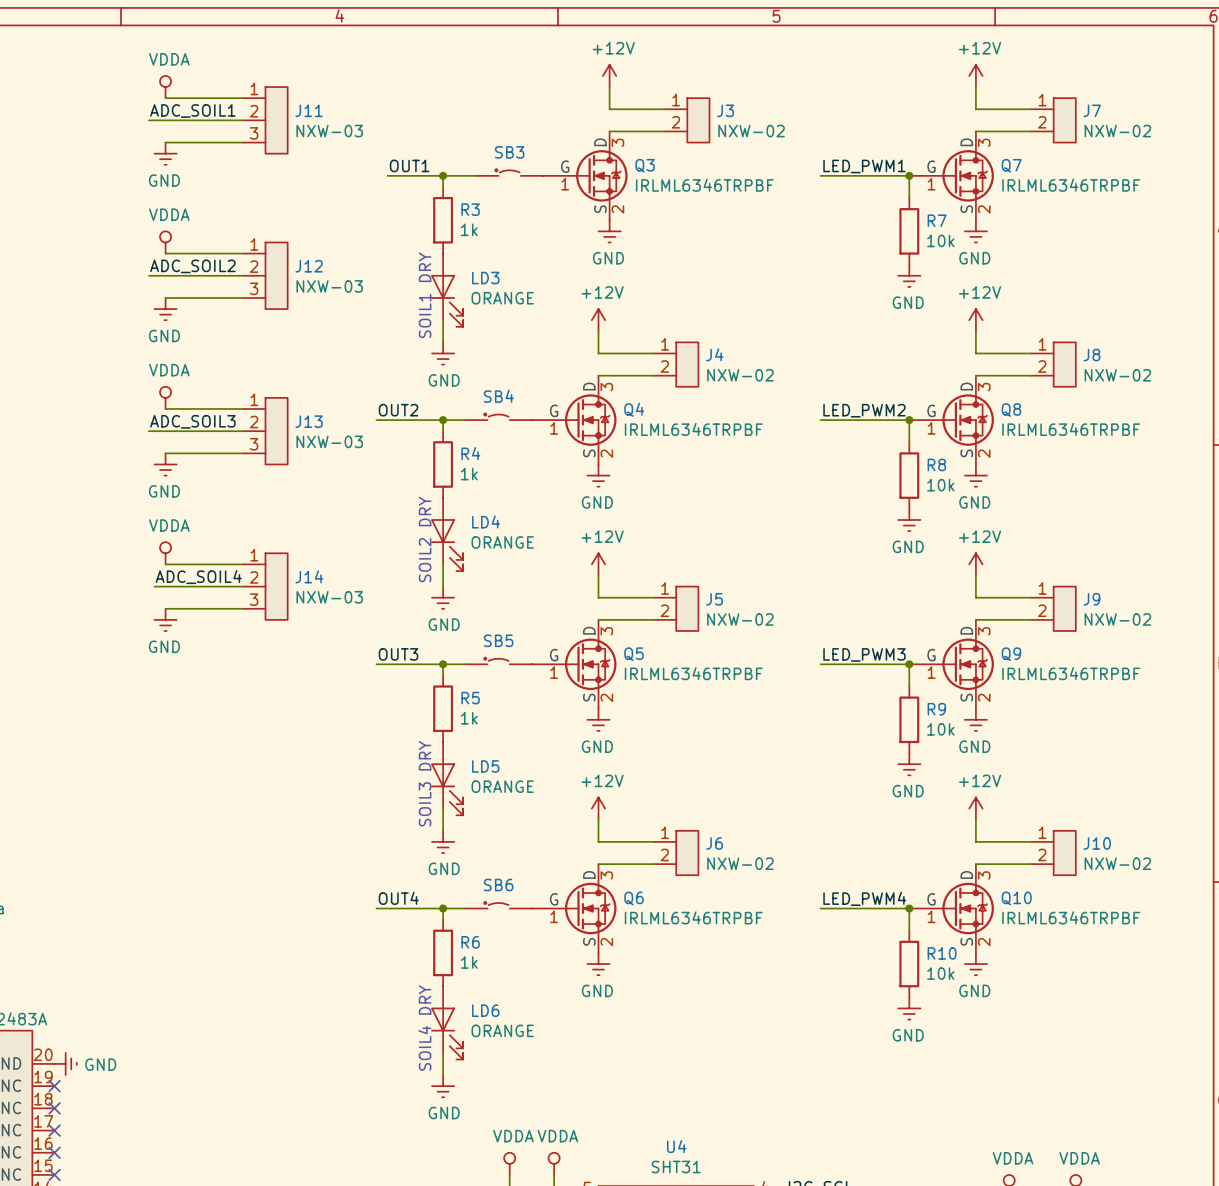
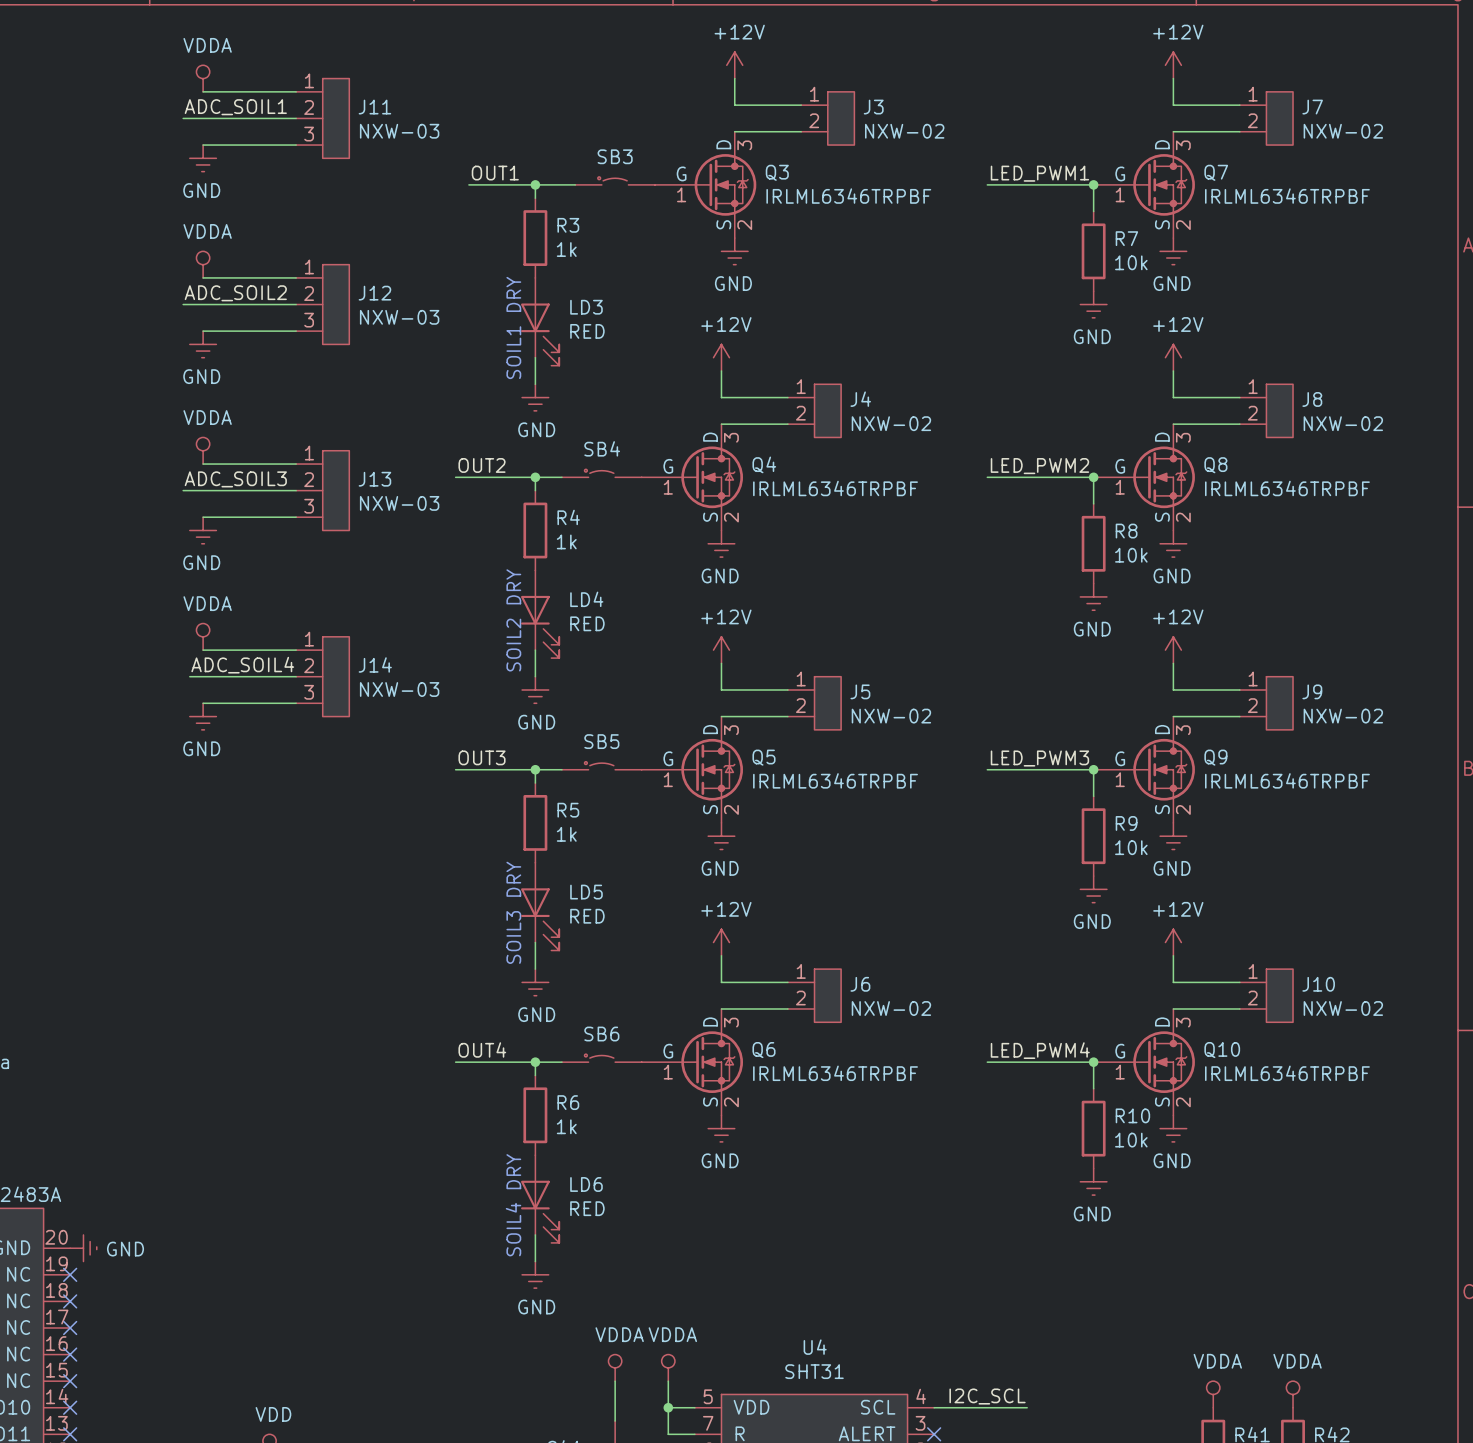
LD3 value: ORANGE (502, 298) -> RED (587, 331)
LD4 value: ORANGE (502, 542) -> RED (587, 623)
LD5 value: ORANGE (502, 786) -> RED (587, 916)
LD6 value: ORANGE (502, 1030) -> RED (587, 1208)

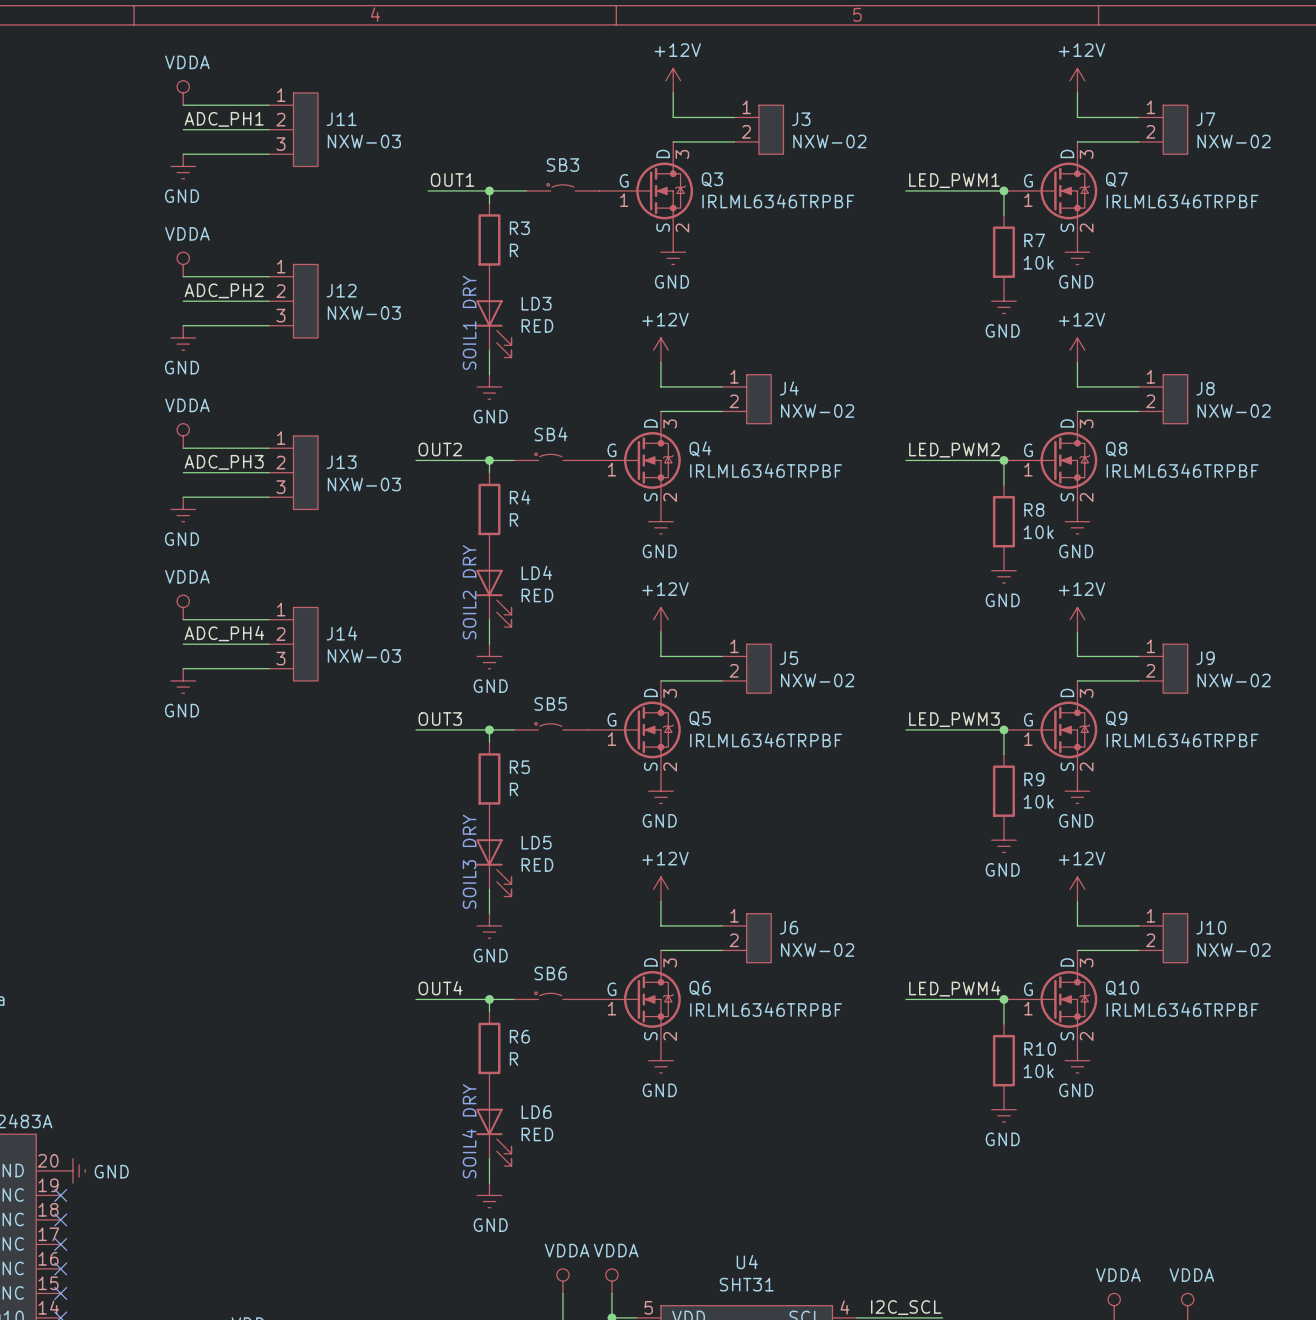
label: ADC_SOIL1 (235, 107) -> ADC_PH1 (224, 119)
wire: (183, 118) (203, 118) -> none
R3 value: 1k (566, 249) -> R (514, 250)
label: ADC_SOIL2 (235, 293) -> ADC_PH2 (224, 290)
wire: (183, 304) (203, 304) -> none
label: ADC_SOIL3 (235, 479) -> ADC_PH3 (224, 462)
wire: (183, 490) (203, 490) -> none
R4 value: 1k (566, 541) -> R (514, 520)
label: ADC_SOIL4 (242, 665) -> ADC_PH4 (224, 633)
wire: (189, 676) (203, 676) -> none
R5 value: 1k (566, 834) -> R (514, 789)
R6 value: 1k (566, 1126) -> R (514, 1059)

